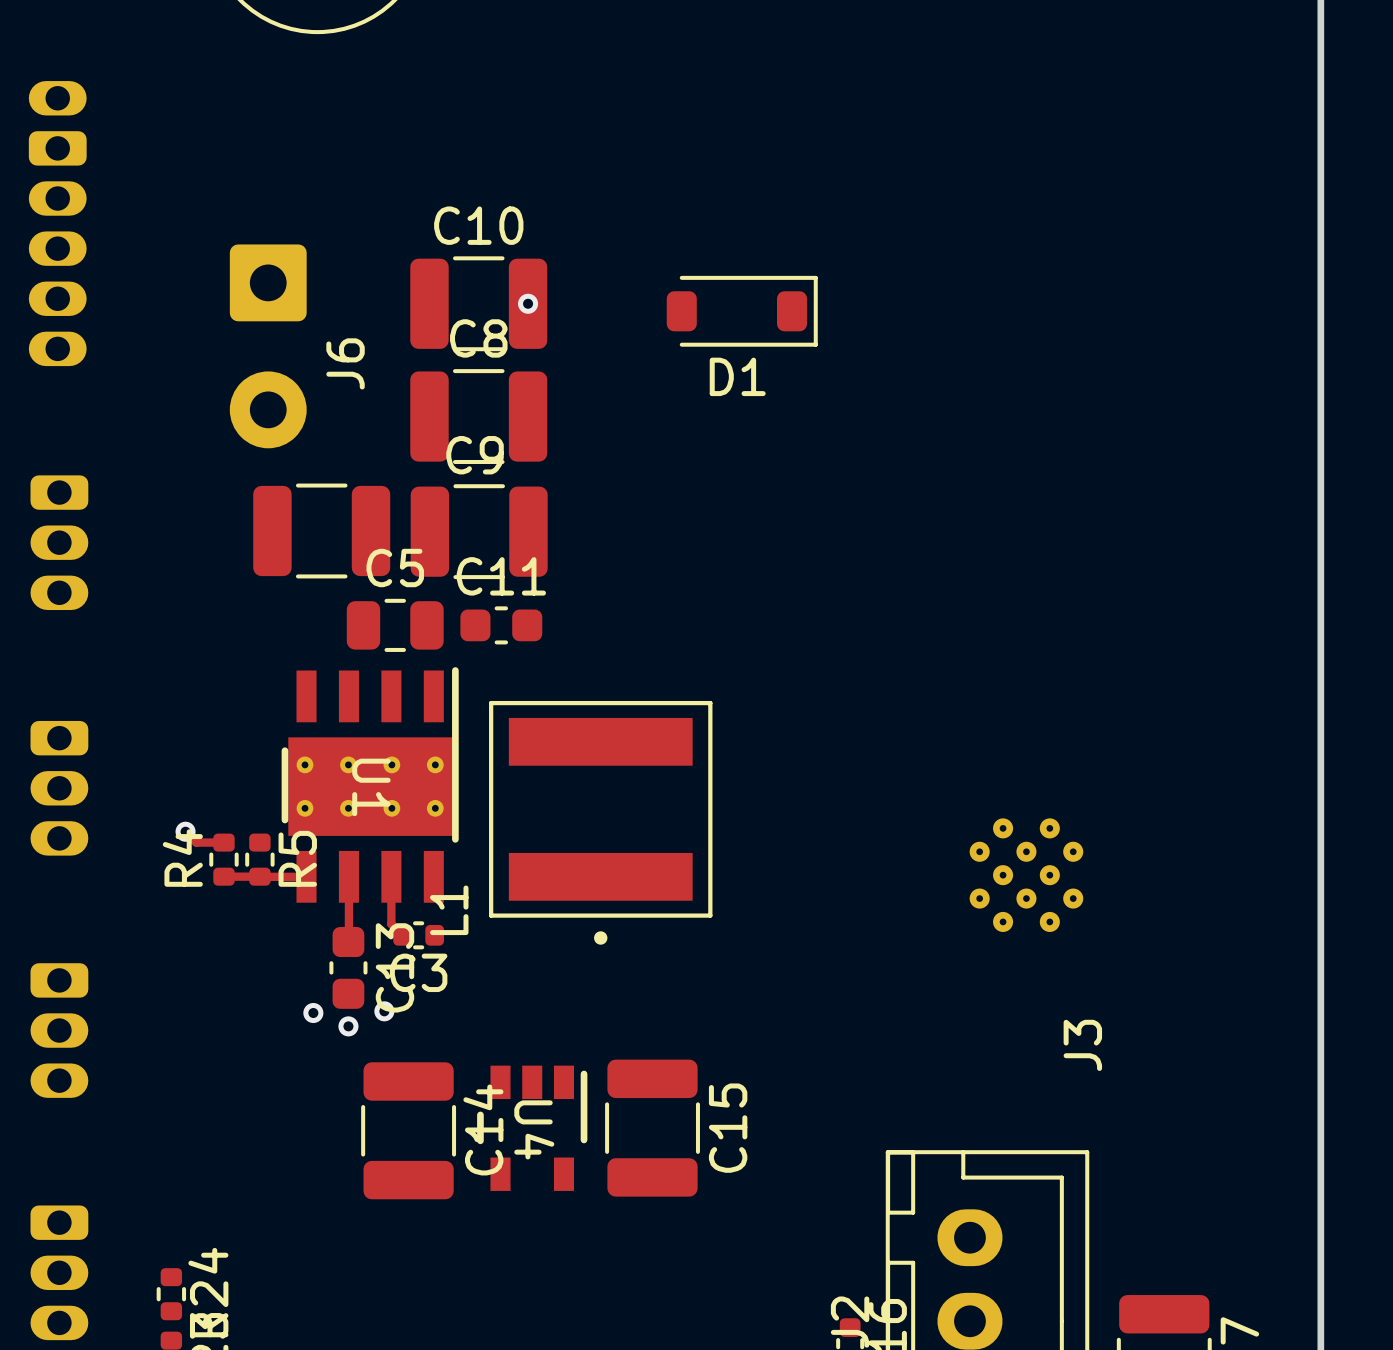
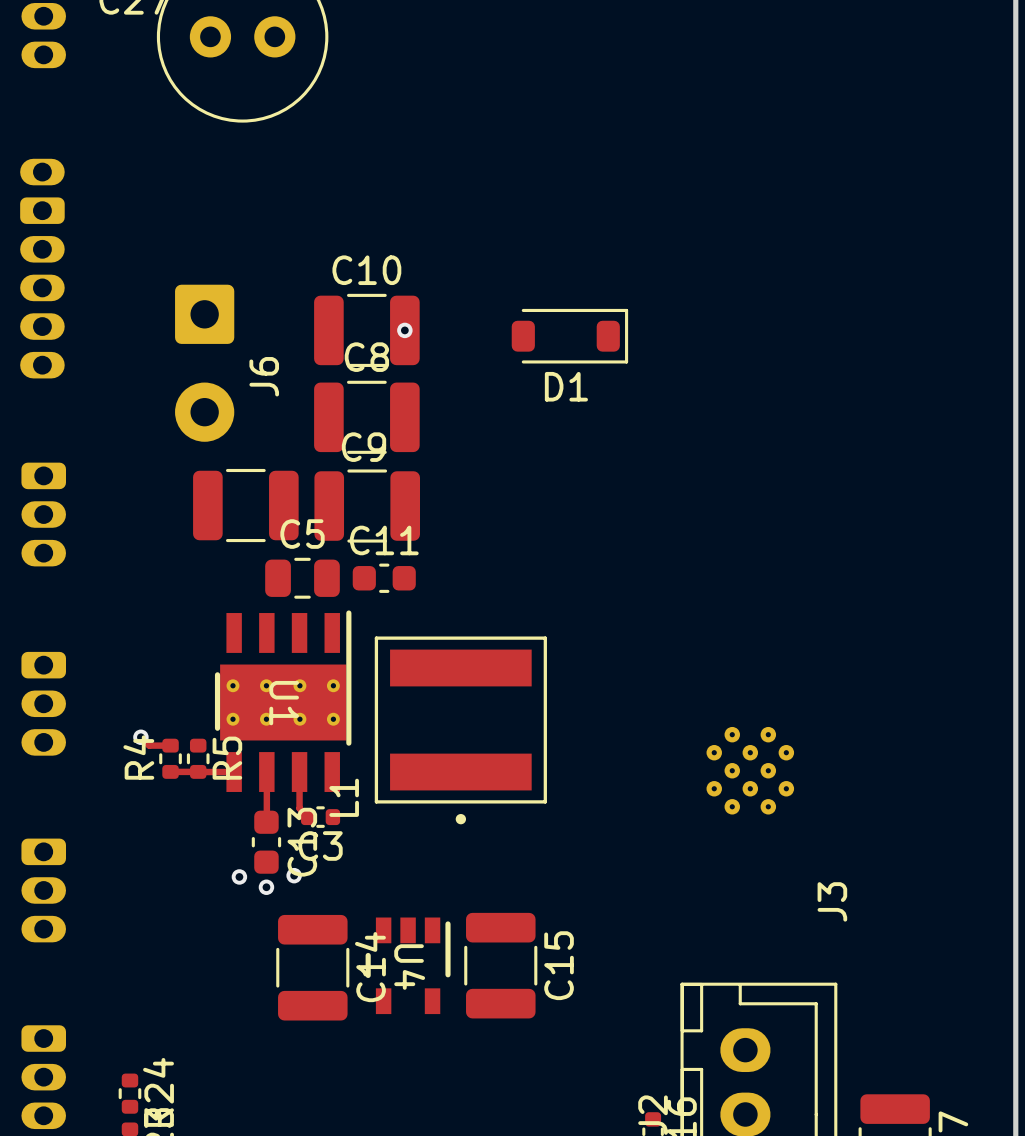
part position: (1026, 875) -> (750, 770)

